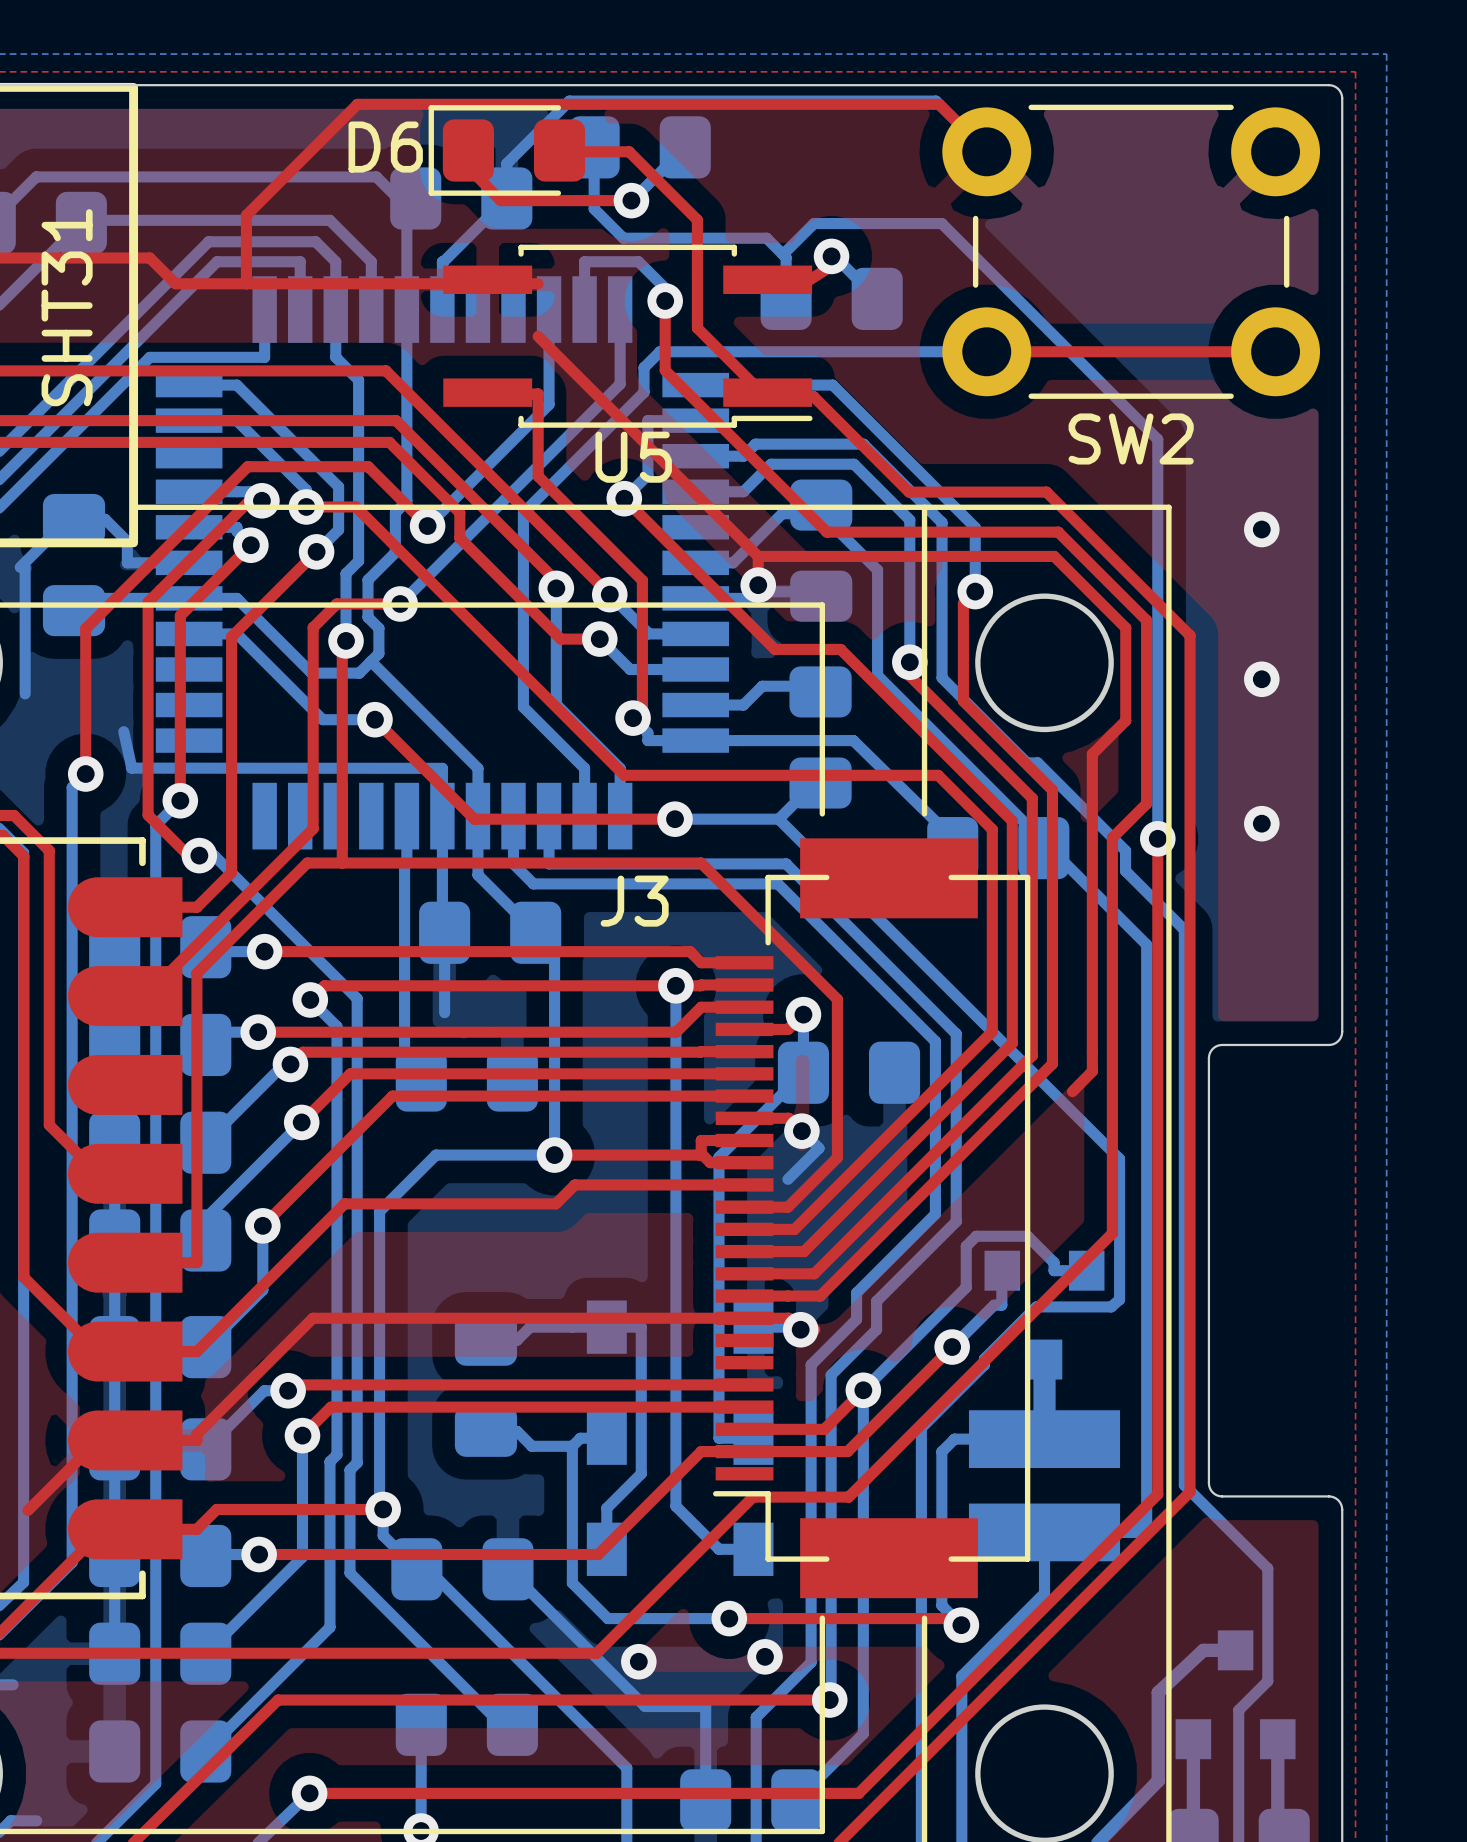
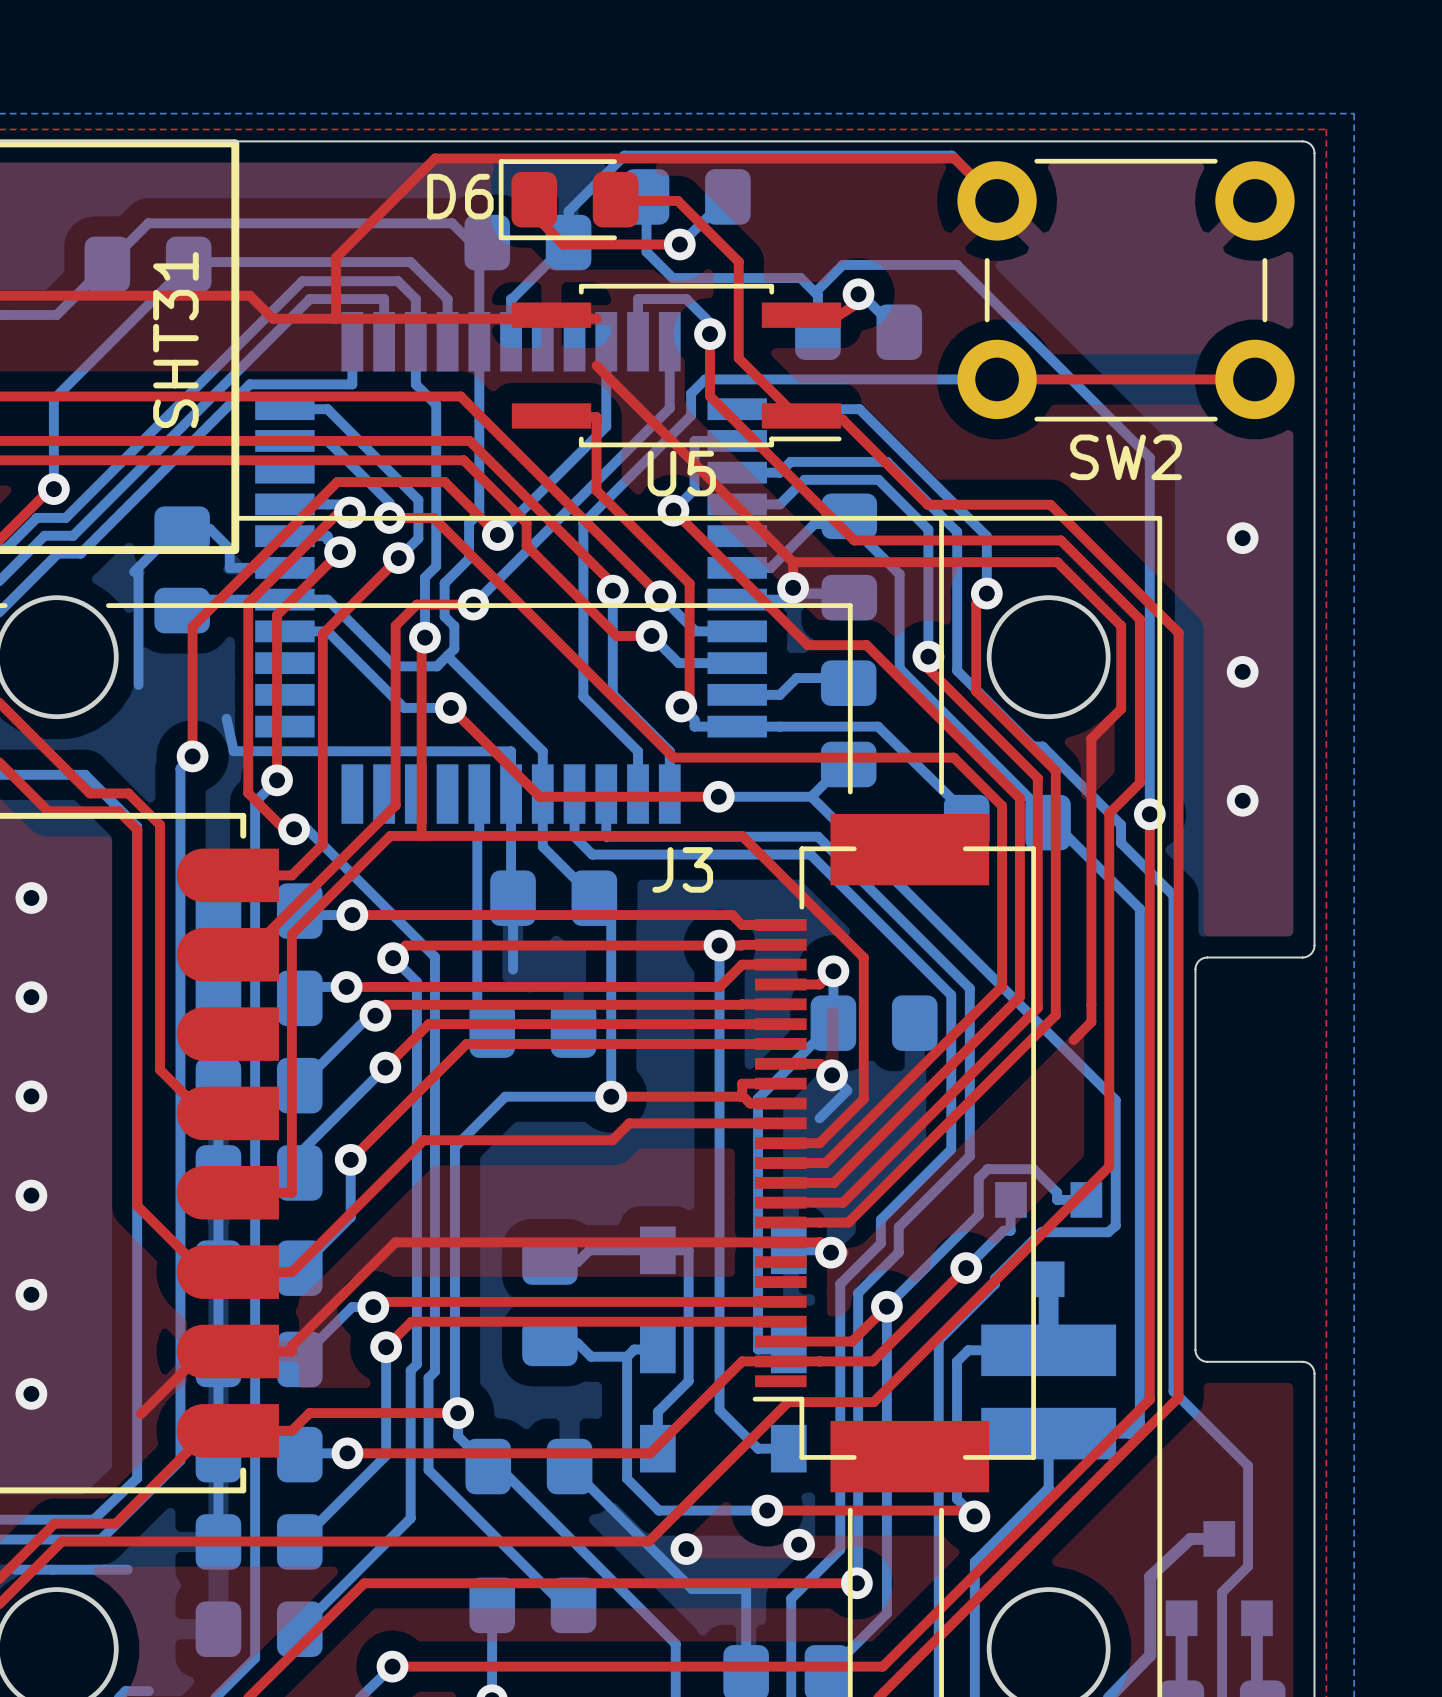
board edge: (1342, 985) (1342, 1033) (1335, 1043) (1328, 1044) (1220, 1045) (1211, 1050) (1208, 1058) -> (1314, 945) (1312, 952) (1304, 957) (1201, 959) (1195, 967) (1195, 1010)
board edge: (1208, 1438) (1209, 1484) (1215, 1494) (1222, 1496) (1330, 1496) (1339, 1501) (1342, 1509) -> (1195, 1349) (1197, 1357) (1205, 1361) (1308, 1363) (1314, 1372) (1314, 1413)

